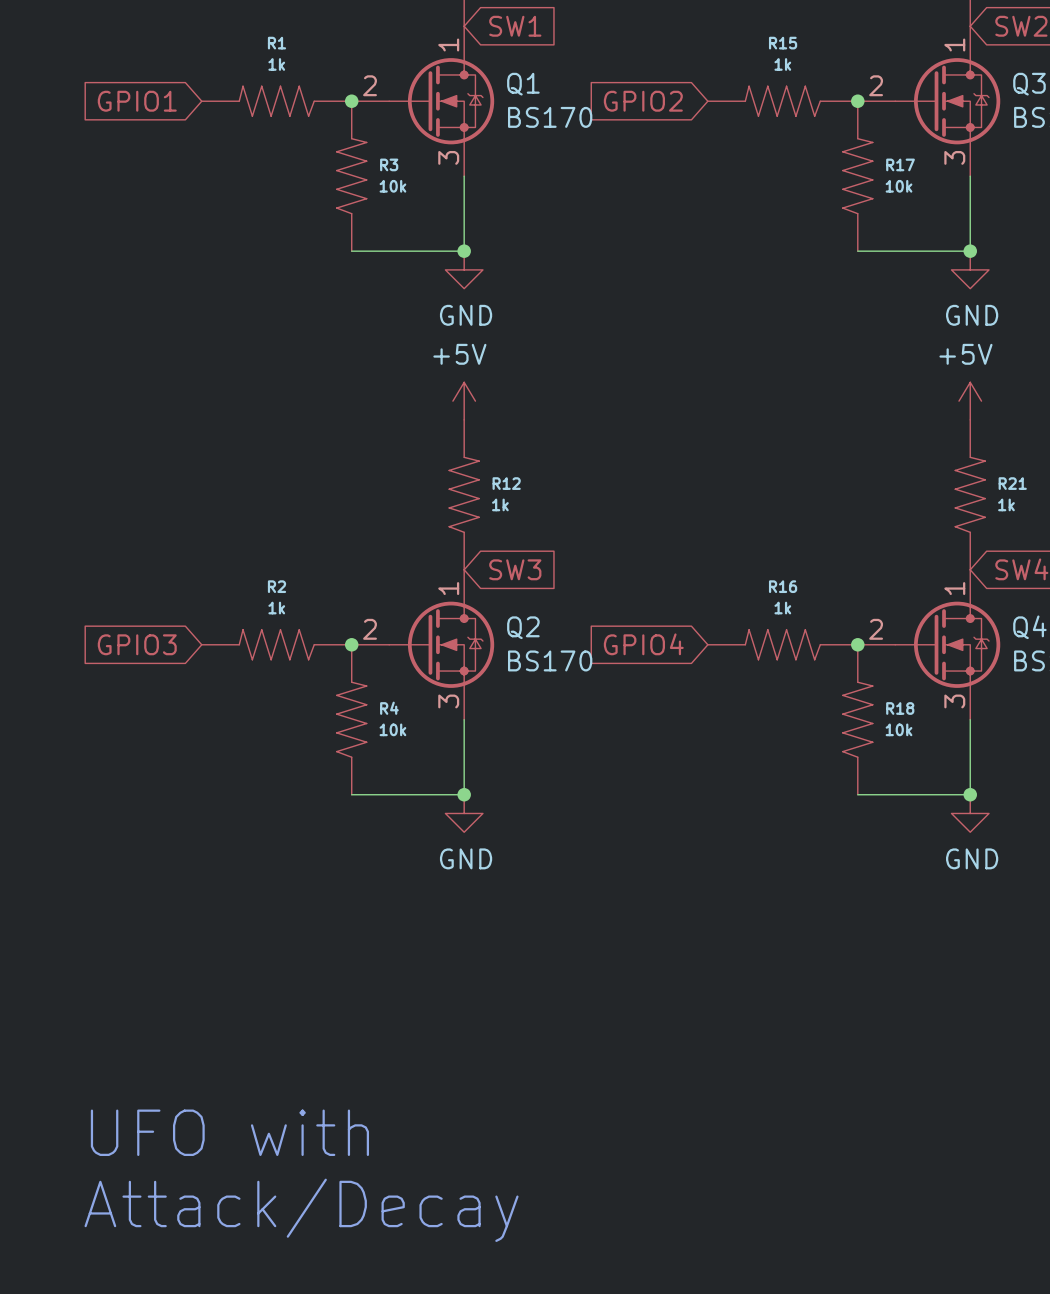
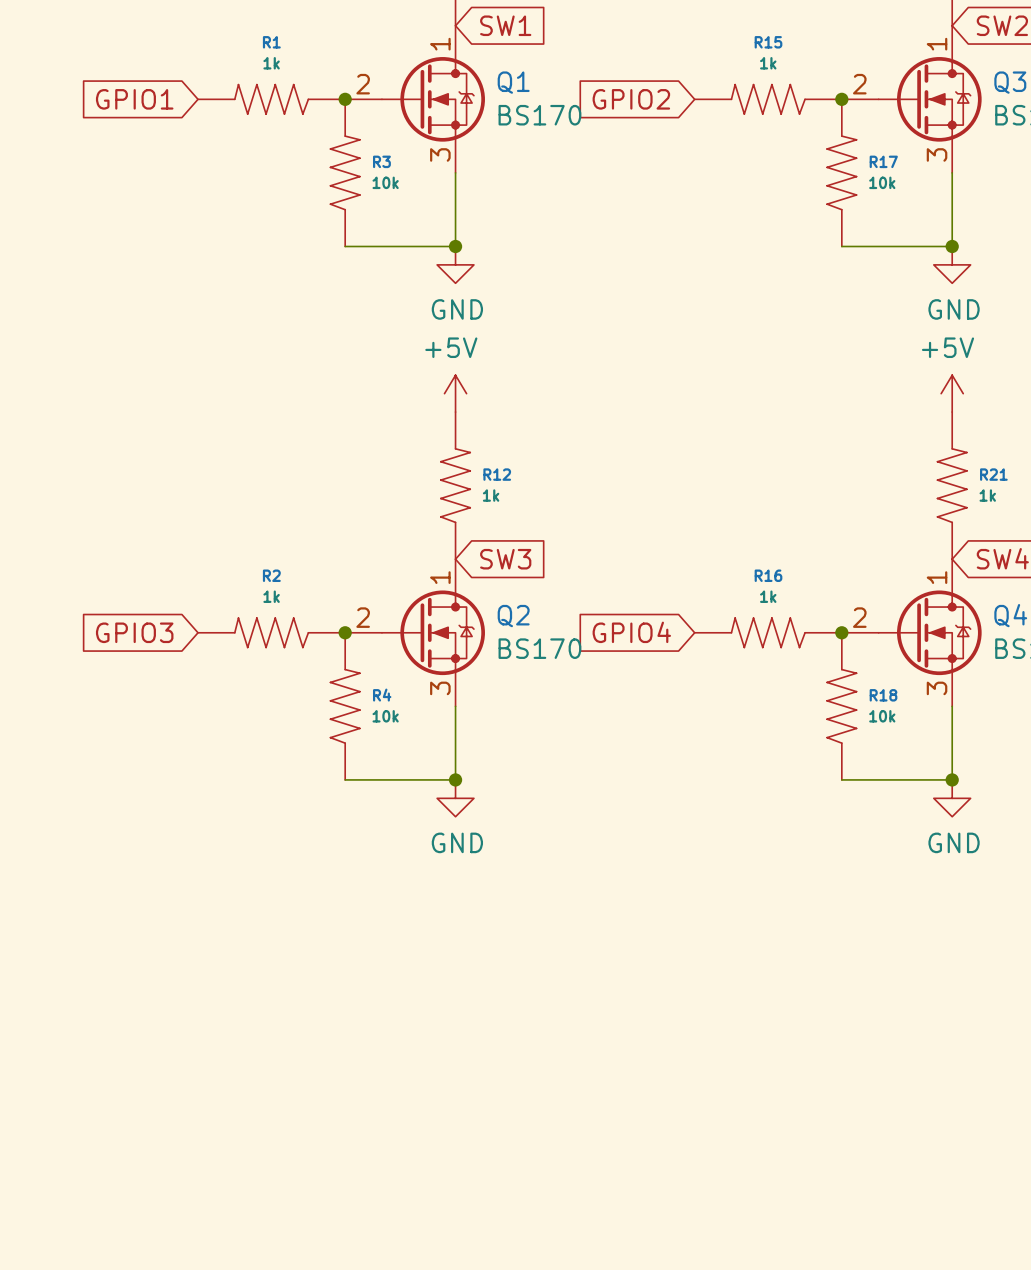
text: UFO with (229, 1132) -> none
text: Attack/Decay (301, 1210) -> none

